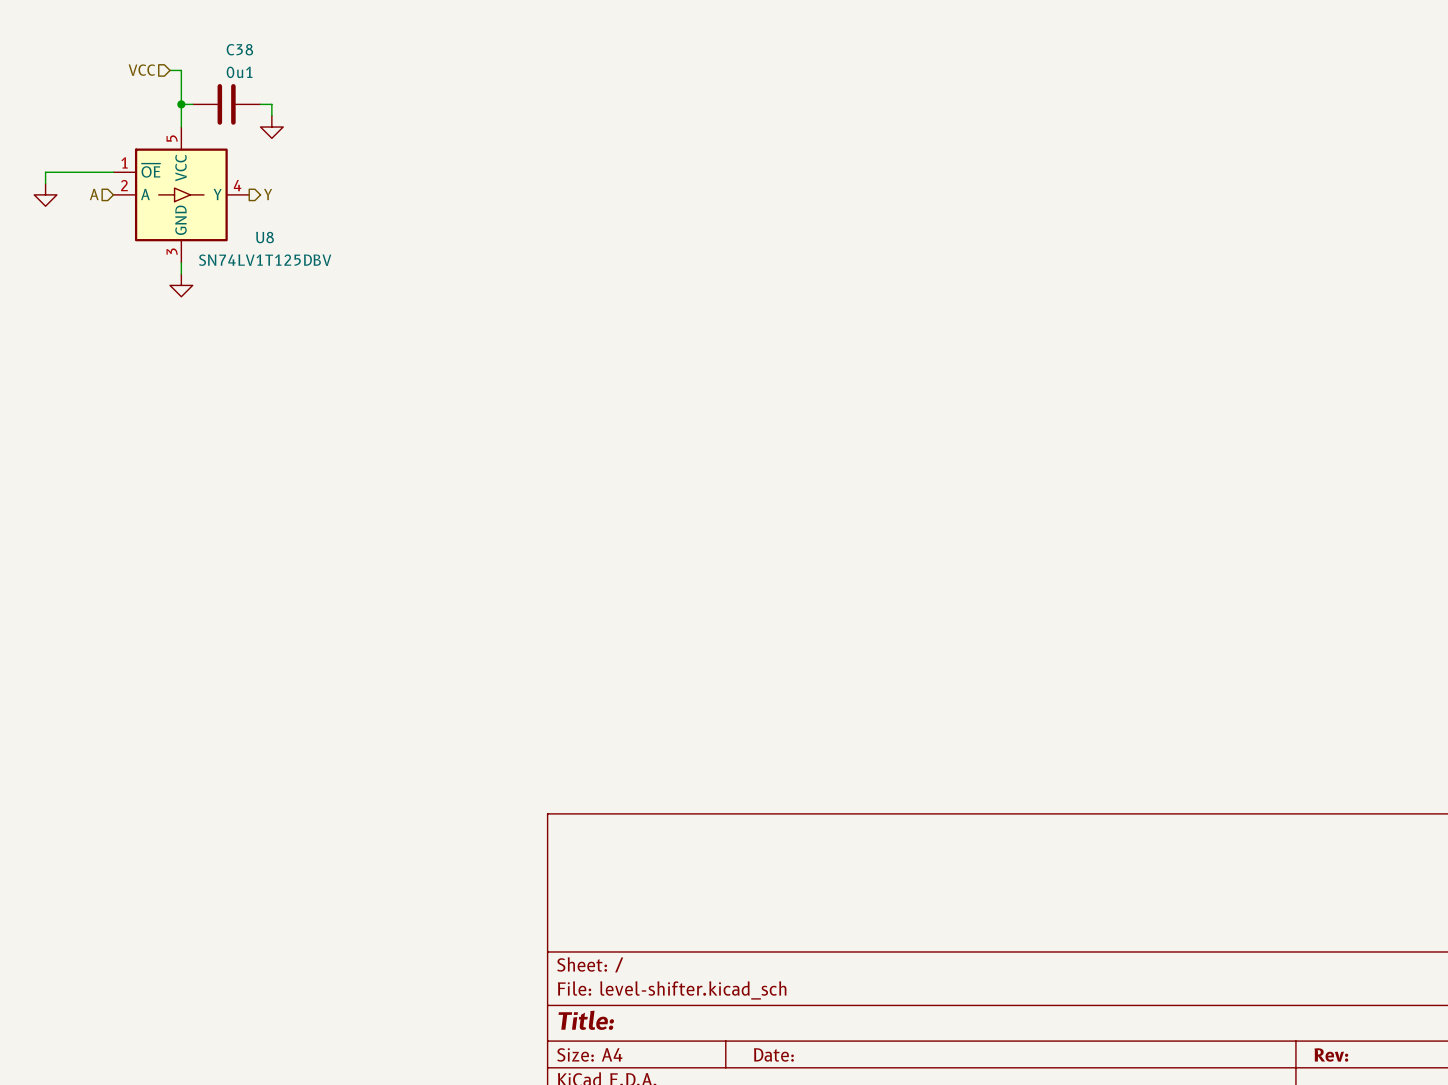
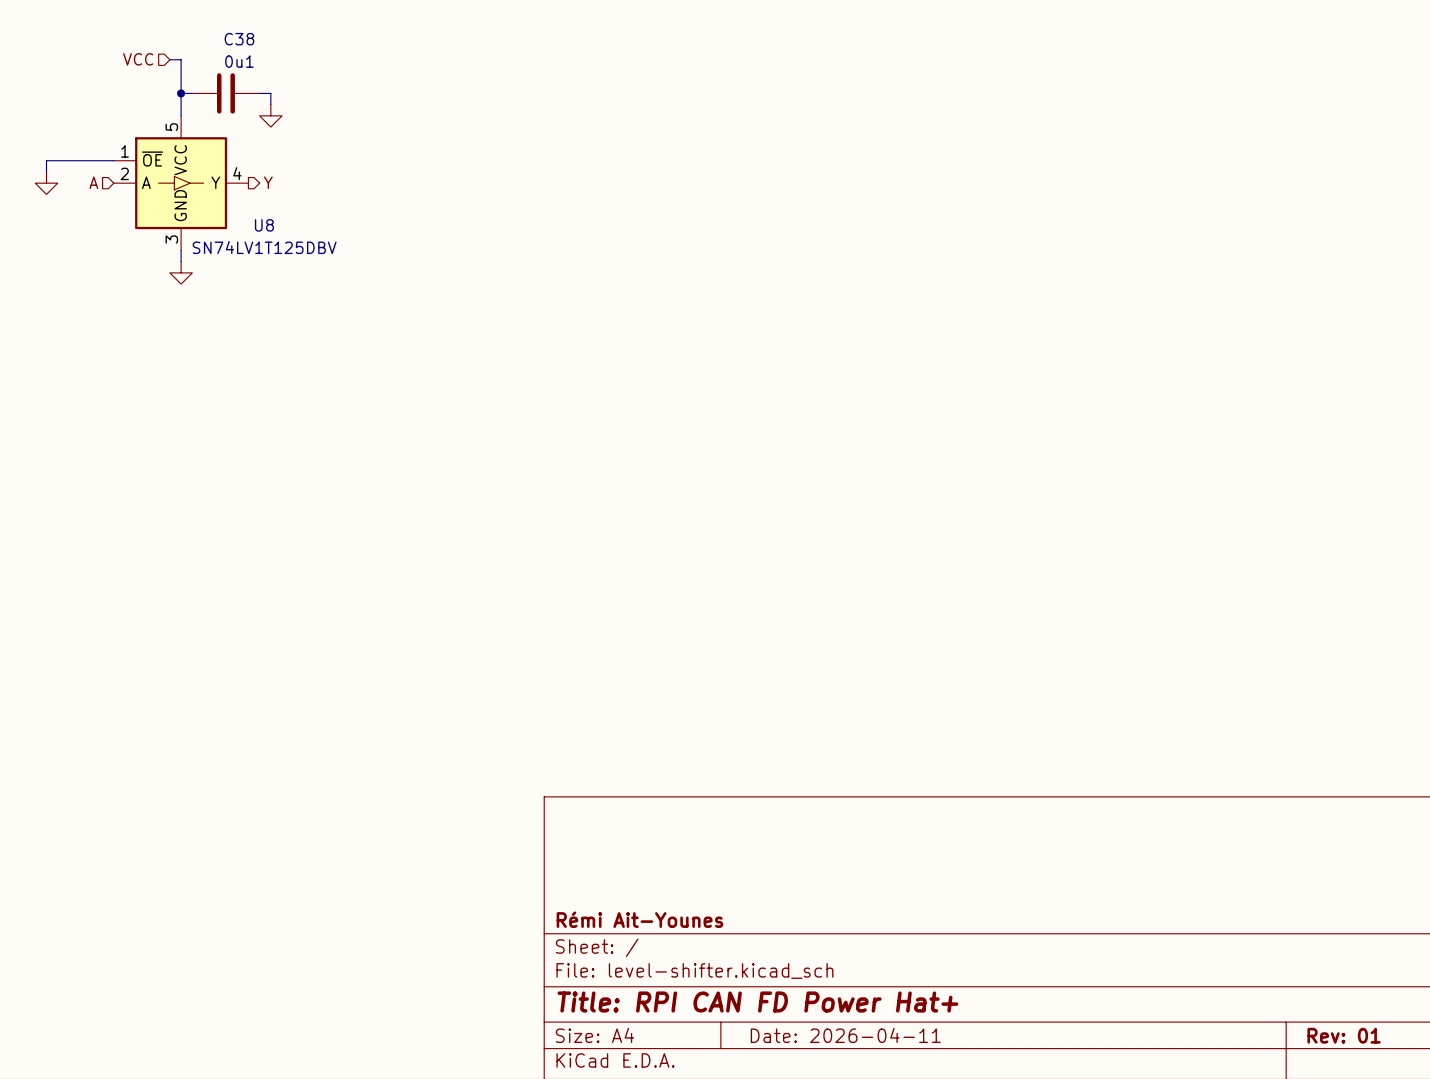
title block: none -> Rémi Ait-Younes (639, 919)
title block: Title: (586, 1020) -> Title: RPI CAN FD Power Hat+ (757, 1002)
title block: Date: (773, 1054) -> Date: 2026-04-11 (845, 1035)
title block: Rev: (1331, 1055) -> Rev: 01 (1344, 1035)

